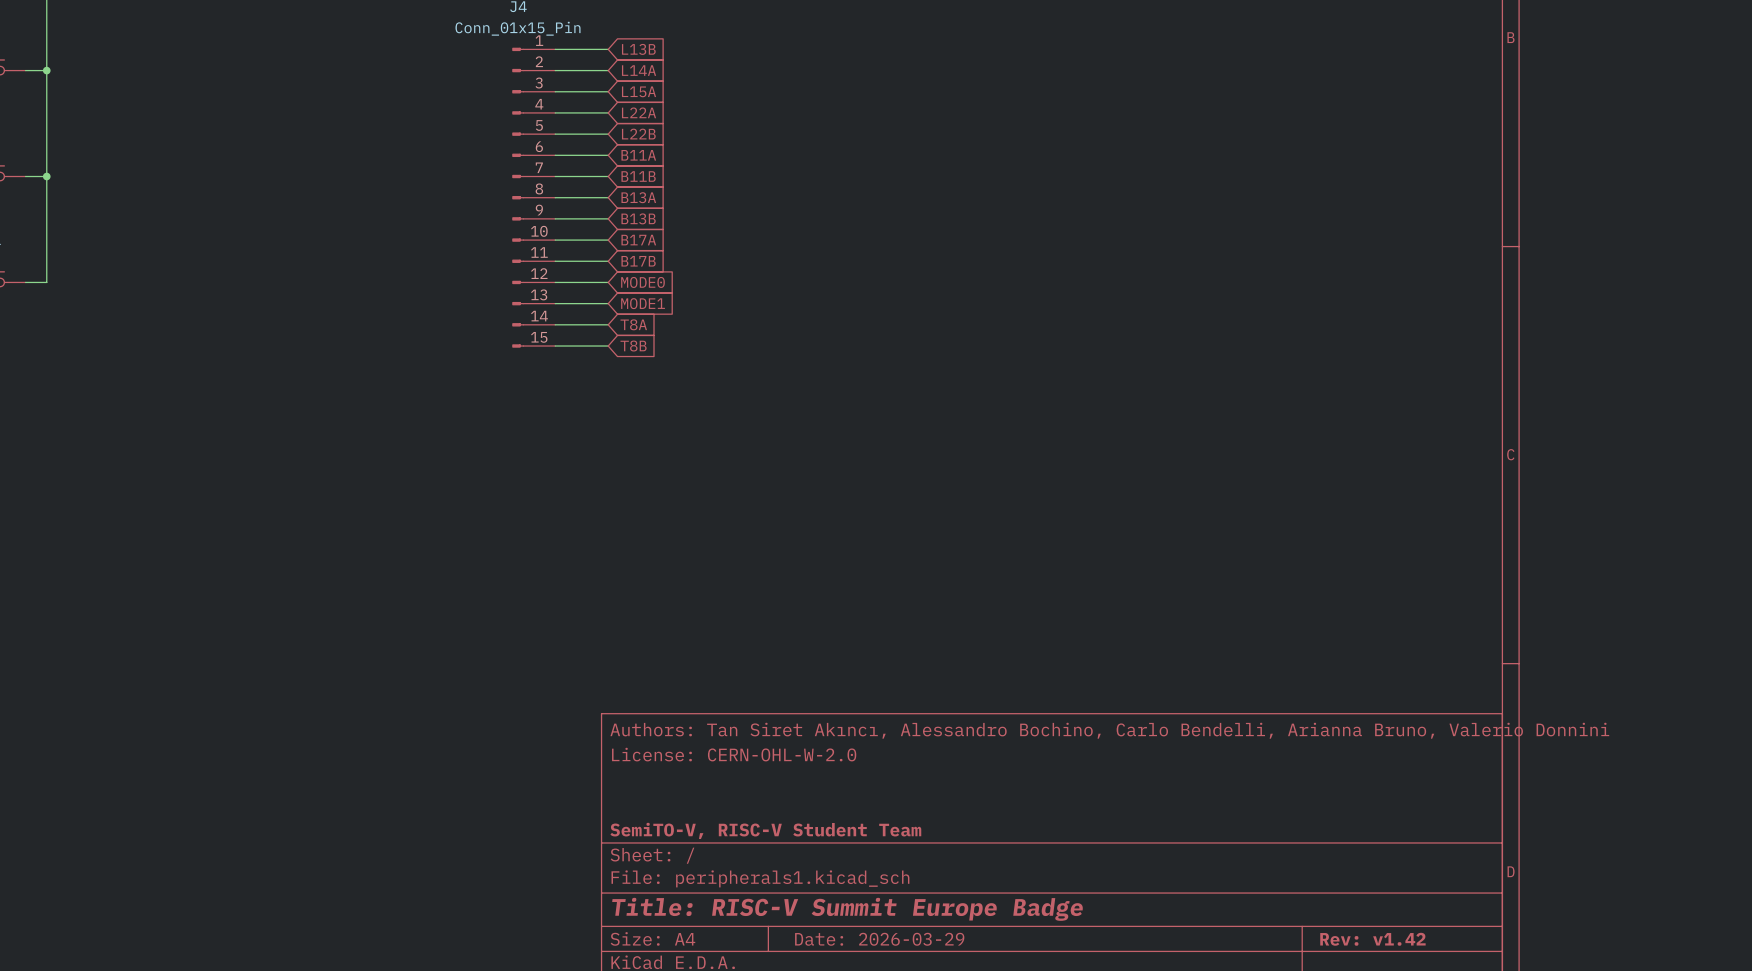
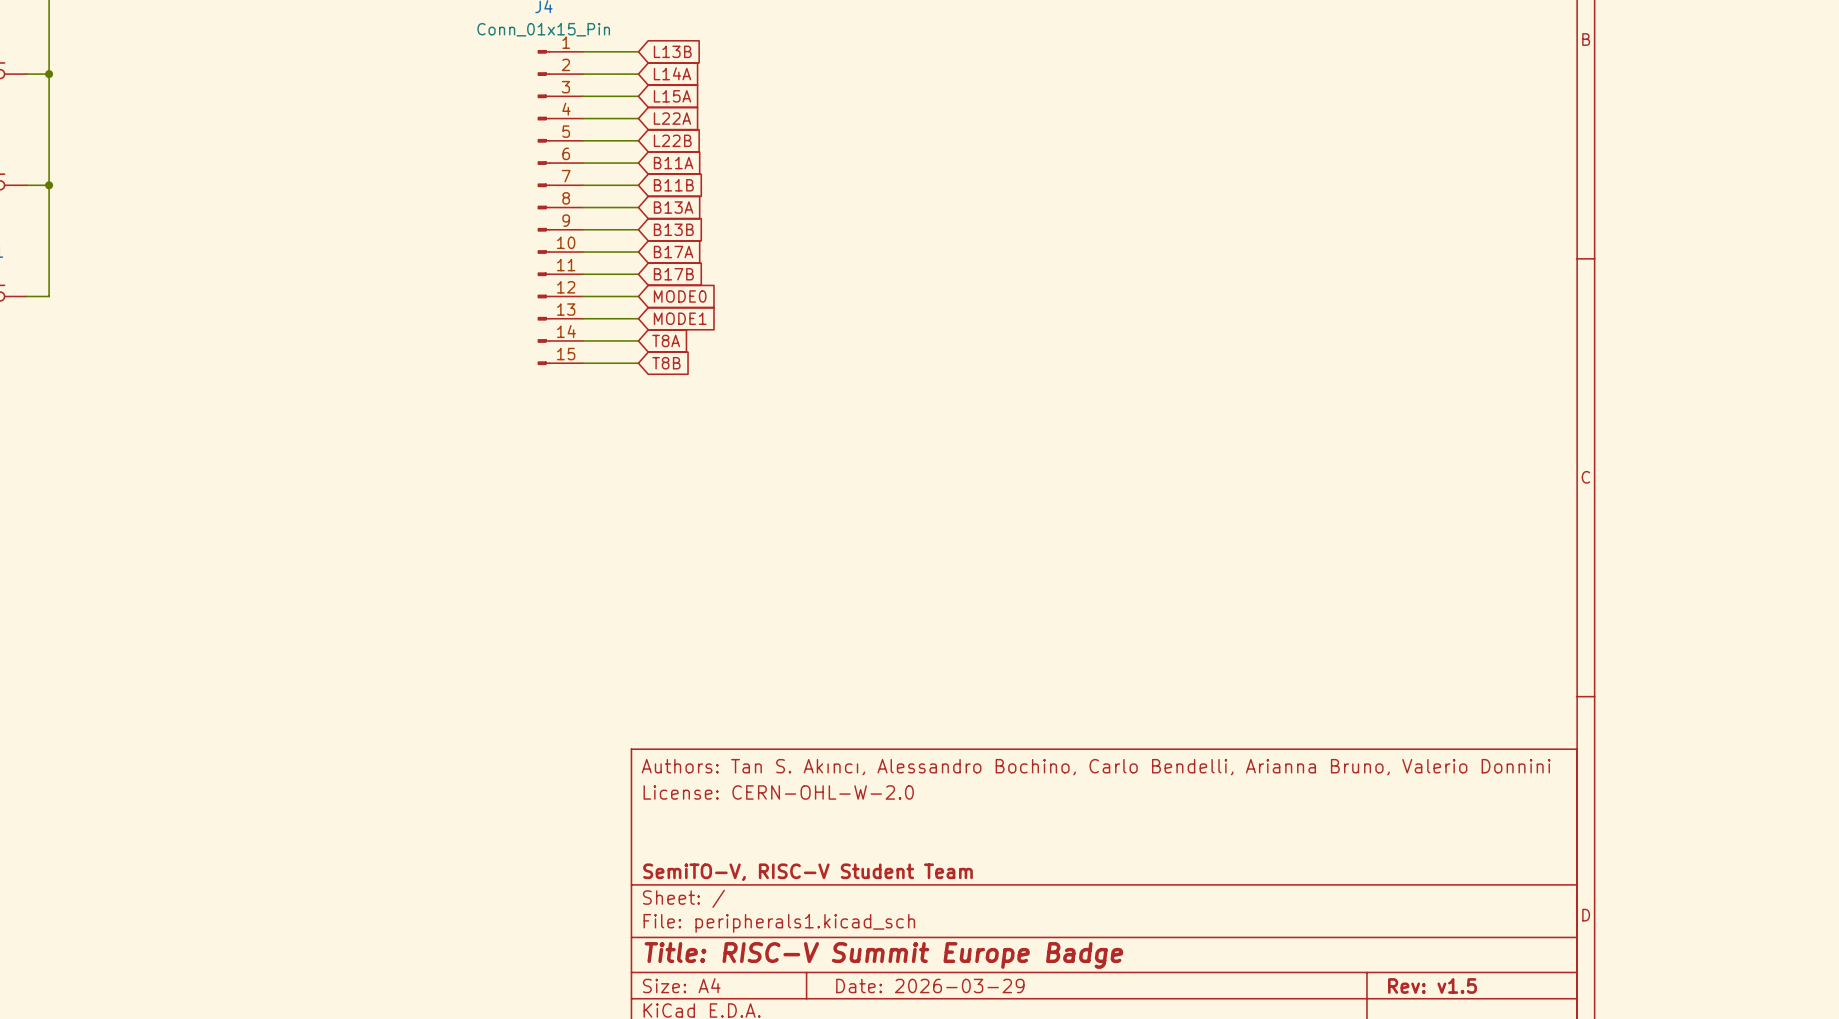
title block: Authors: Tan Siret Akıncı, Alessandro Bochino, Carlo Bendelli, Arianna Bruno, Valerio Donnini (1109, 730) -> Authors: Tan S. Akıncı, Alessandro Bochino, Carlo Bendelli, Arianna Bruno, Valerio Donnini (1096, 767)
title block: Rev: v1.42 (1372, 939) -> Rev: v1.5 (1432, 985)

